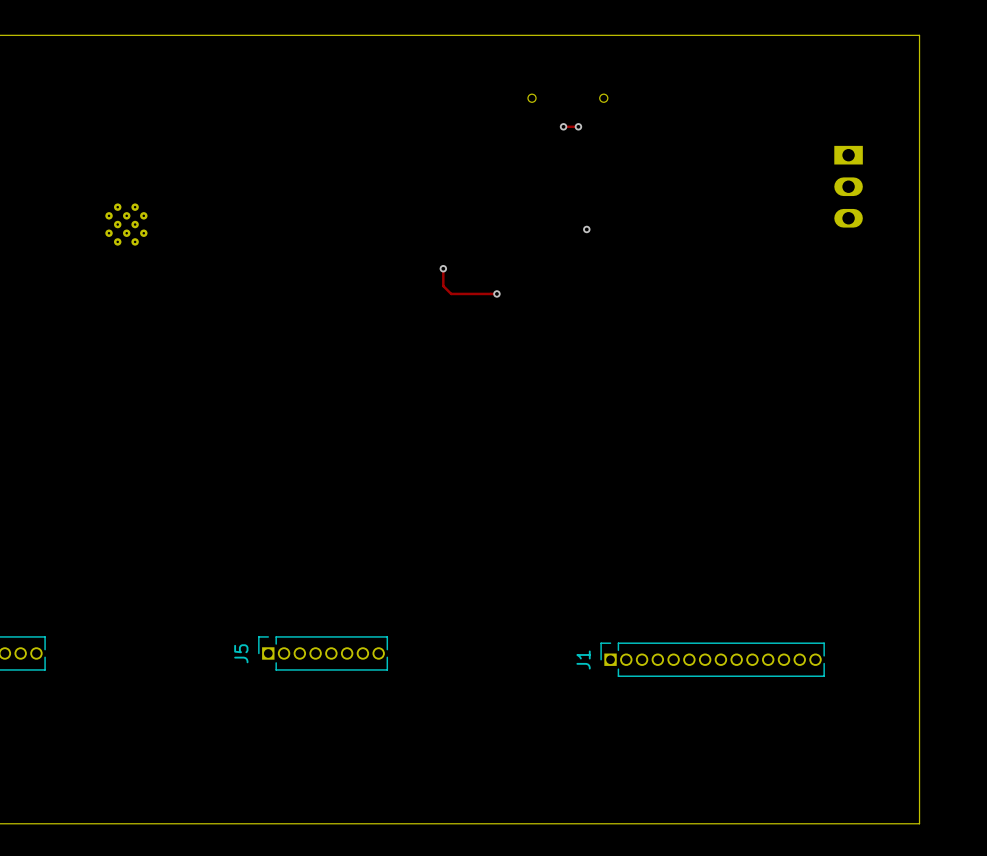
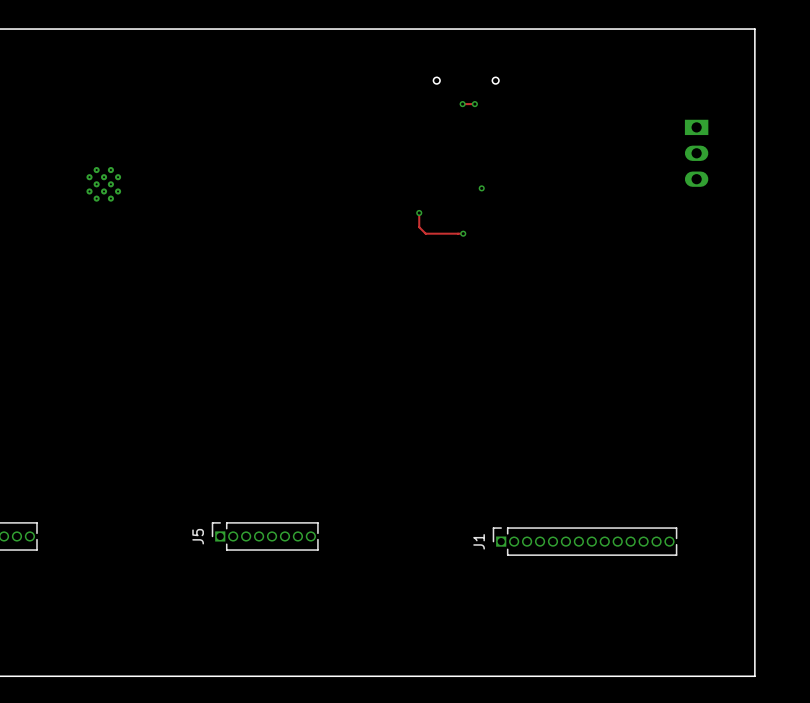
via: none -> (419, 212)
track: (443, 268) (443, 286) (451, 293) (496, 293) -> (419, 212) (419, 227) (425, 233) (463, 233)
via: (443, 268) -> none
via: none -> (463, 233)
via: (496, 293) -> none

